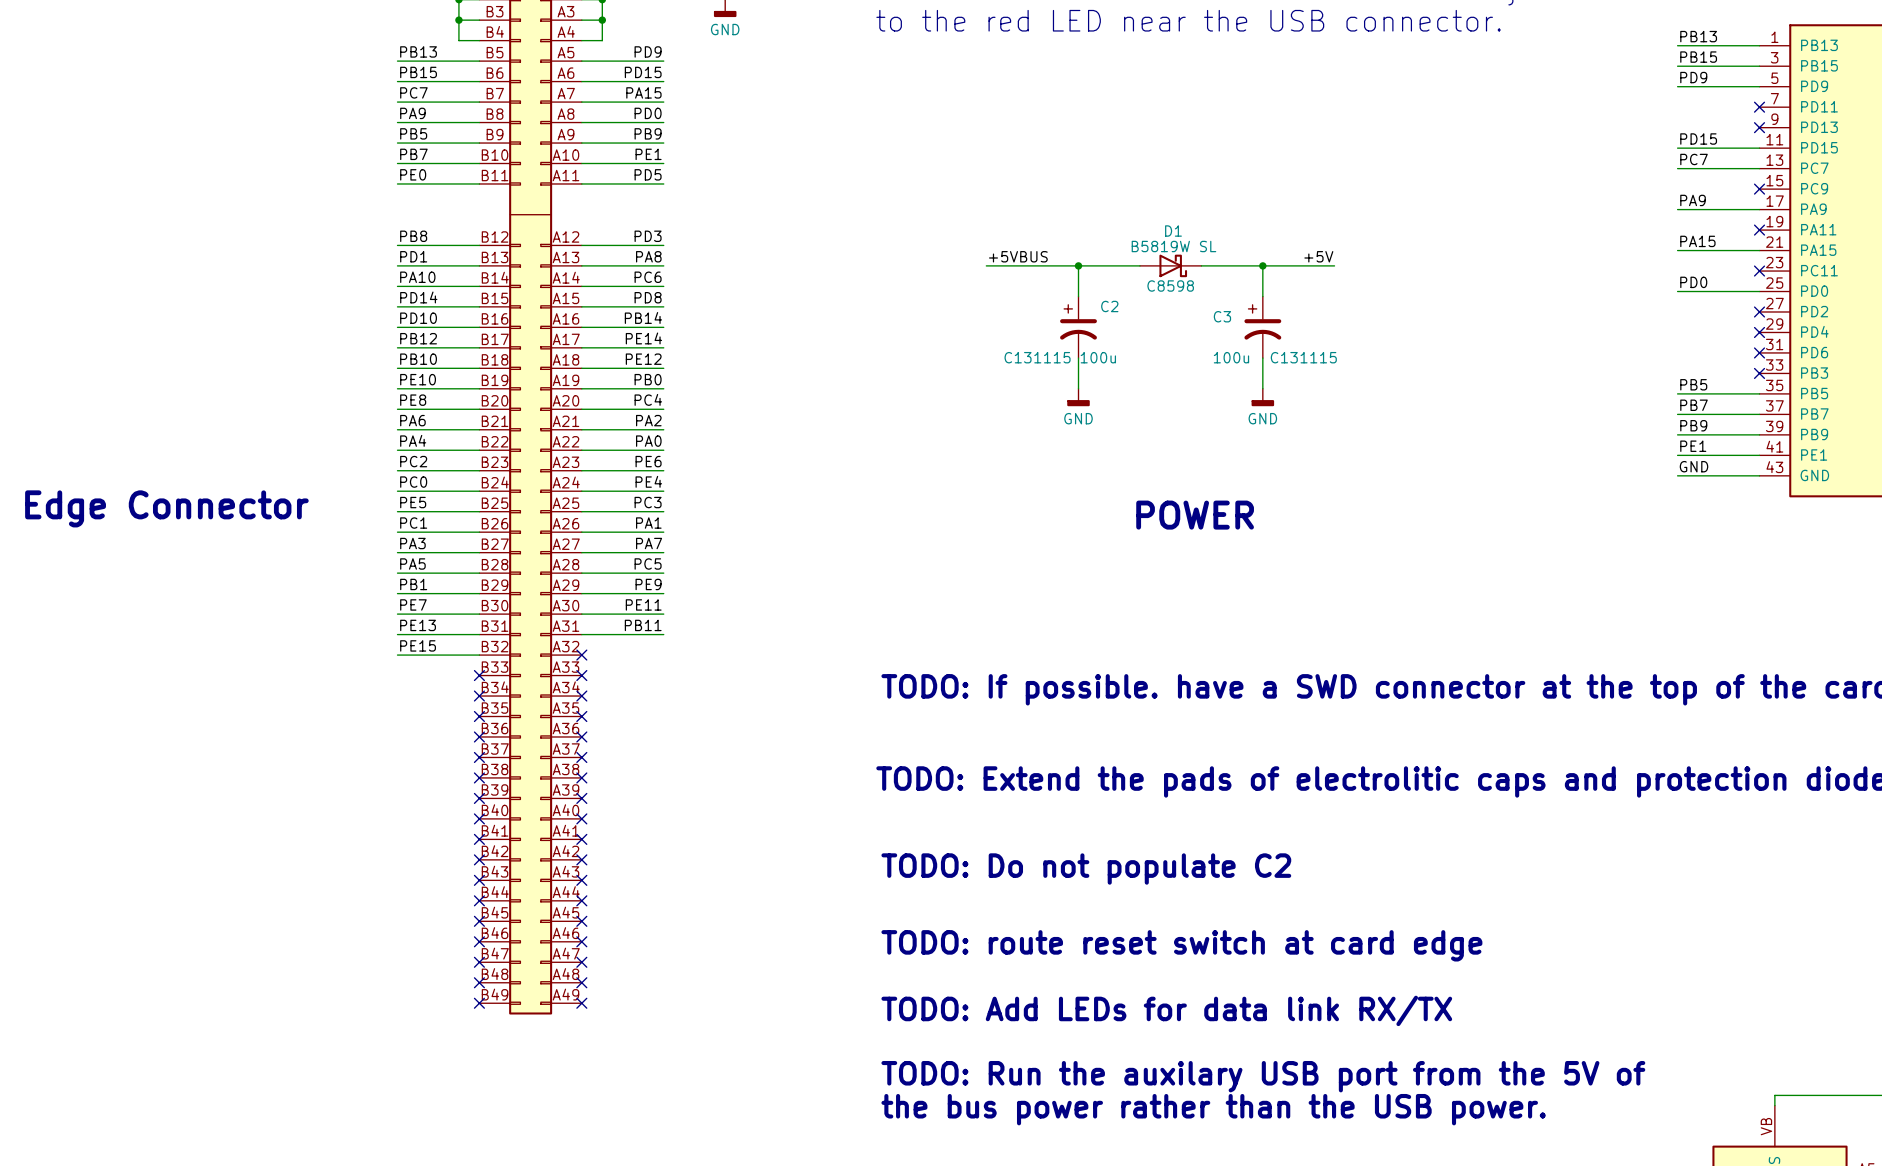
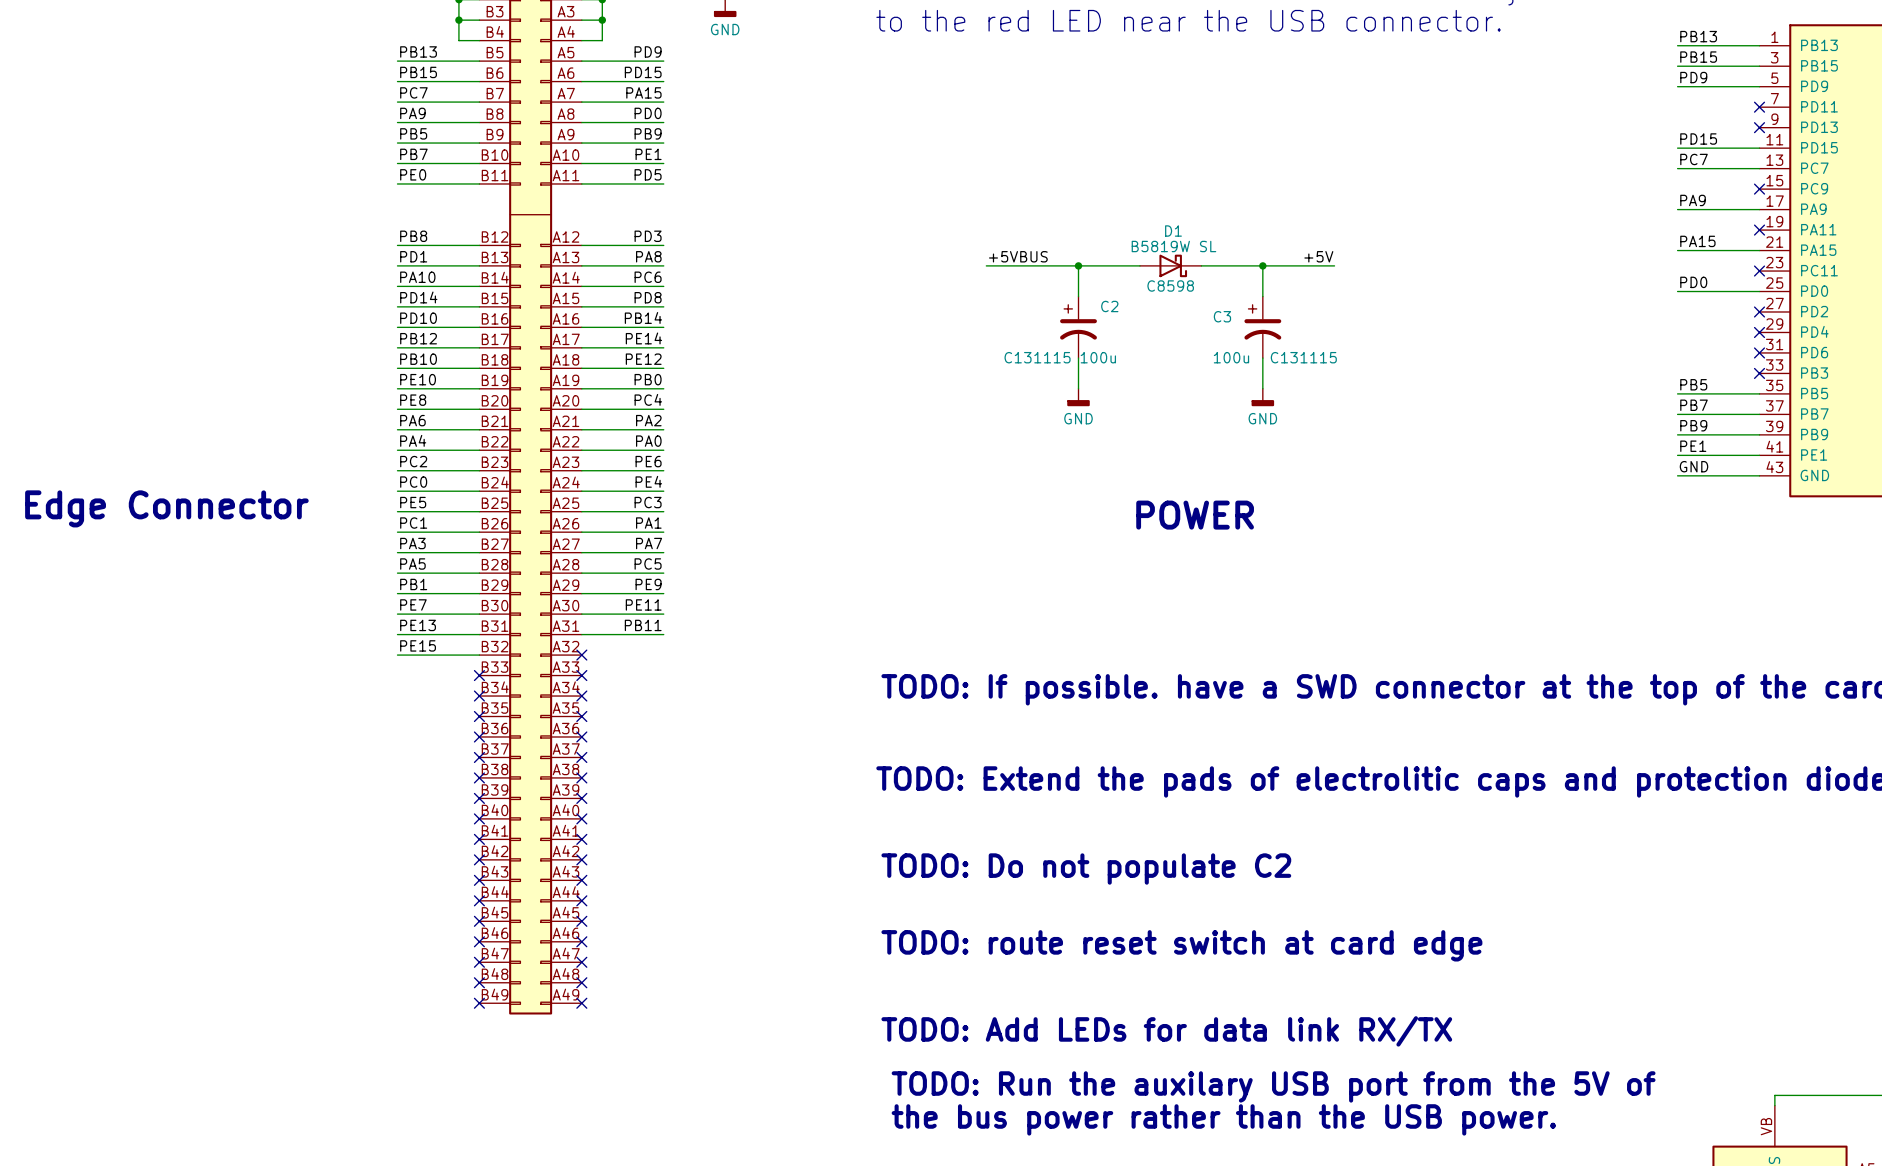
text position: TODO: Add LEDs for data link RX/TX (1166, 1010) -> TODO: Add LEDs for data link RX/TX (1166, 1031)
text position: TODO: Run the auxilary USB port from the 5V of (1263, 1076) -> TODO: Run the auxilary USB port from the 5V of (1273, 1086)
text position: the bus power rather than the USB power. (1213, 1109) -> the bus power rather than the USB power. (1223, 1119)

